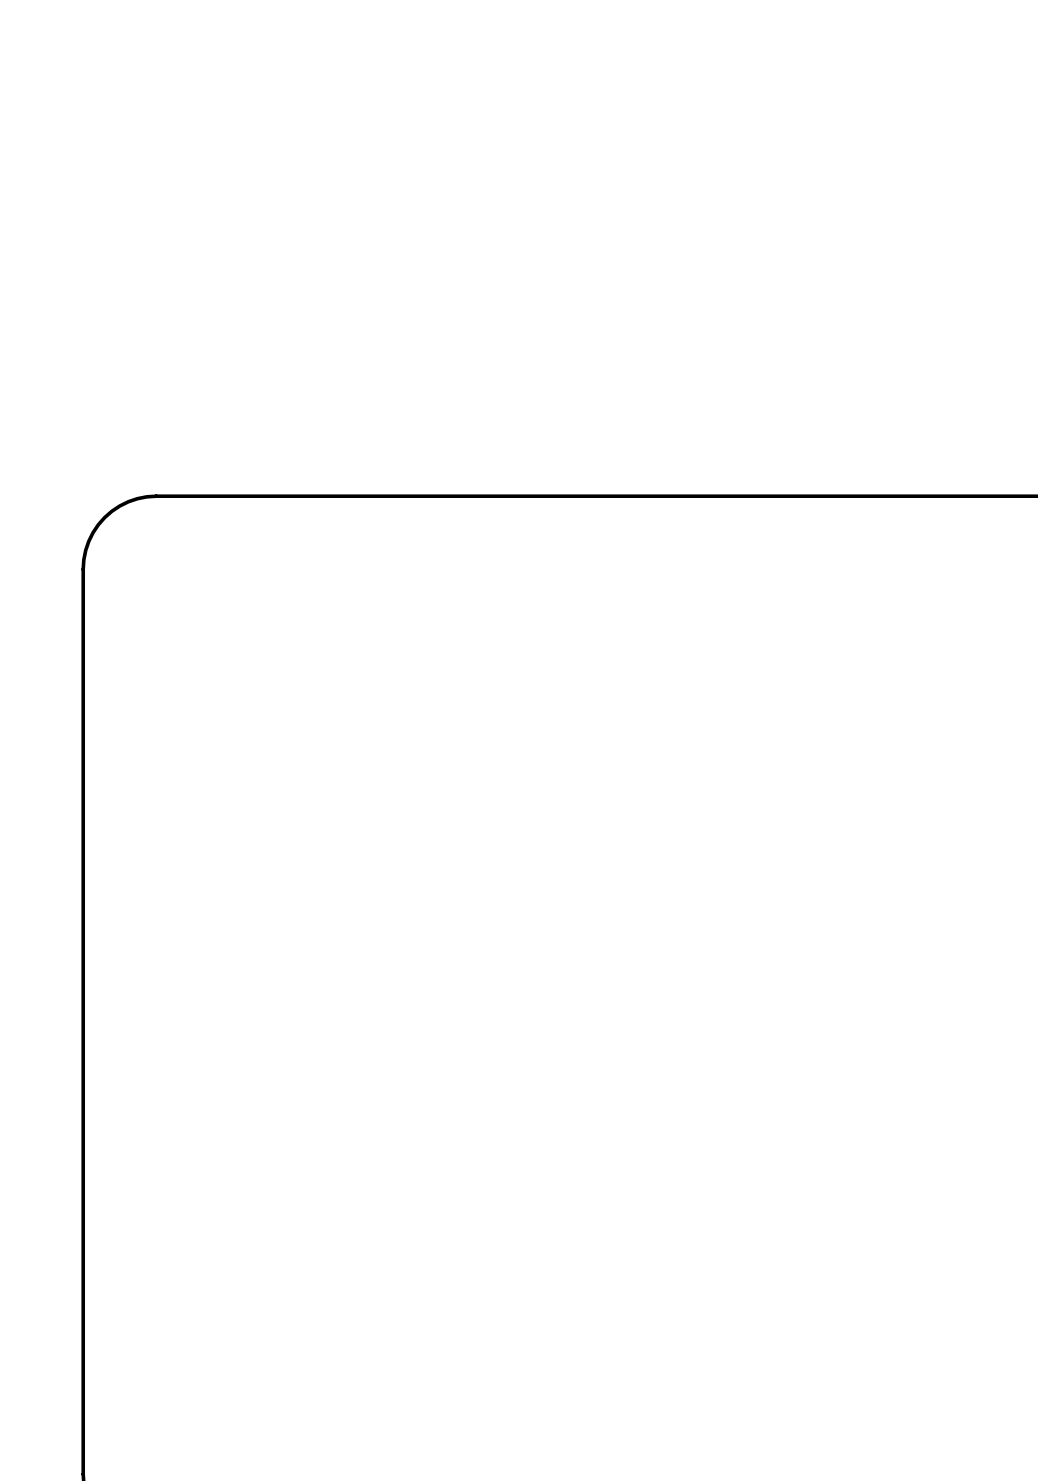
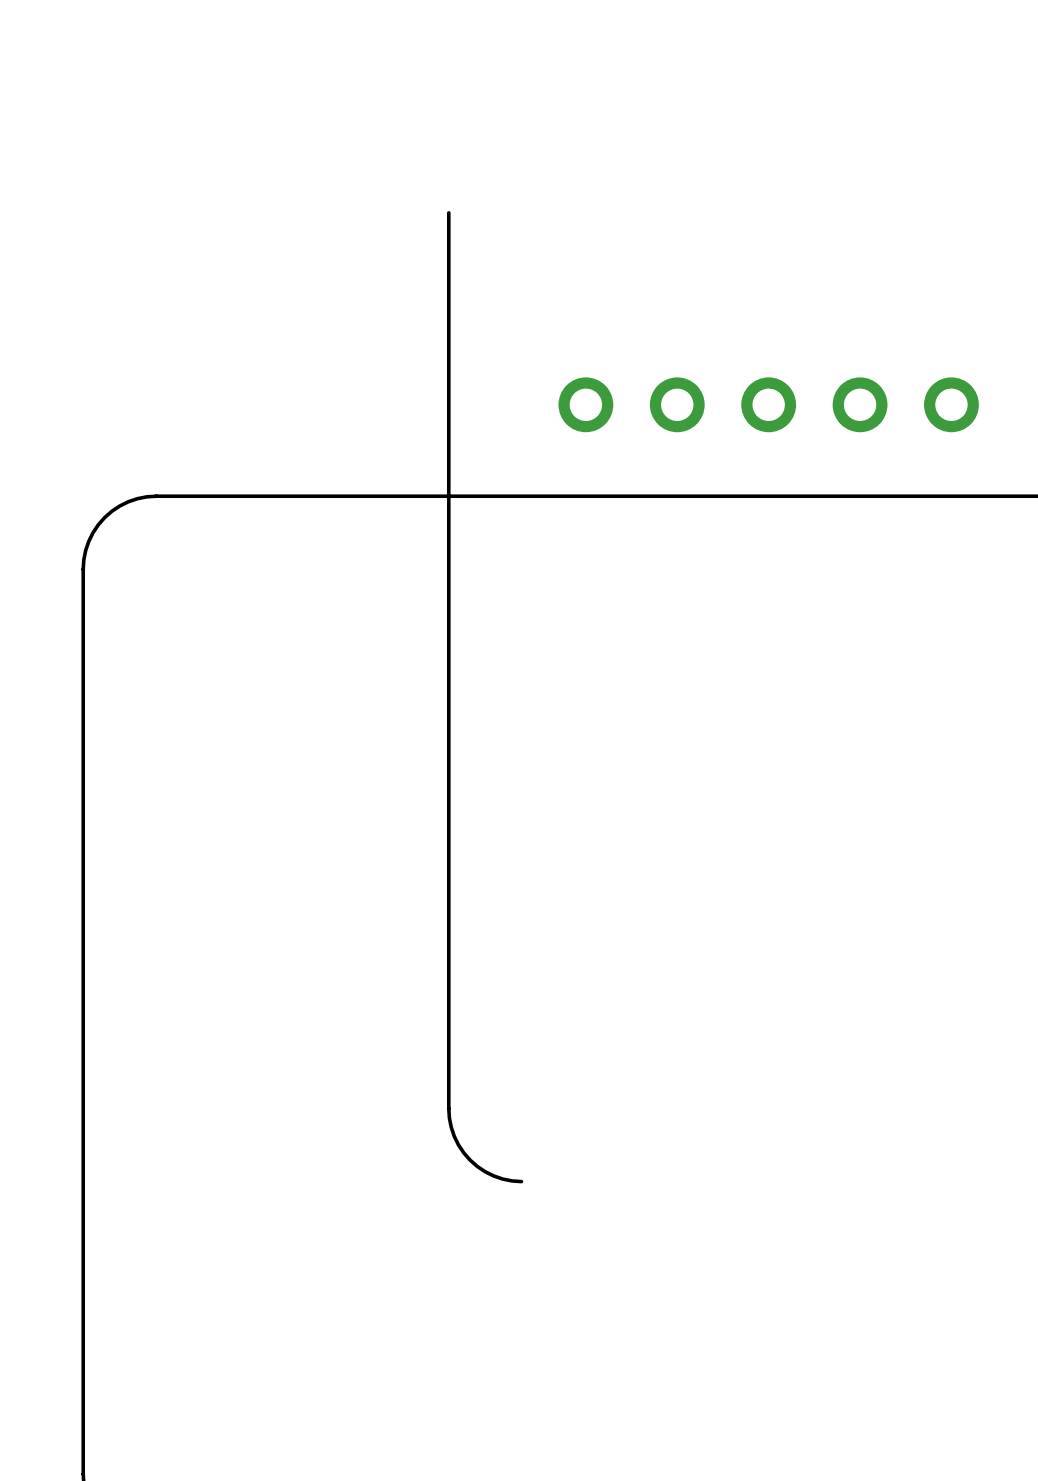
board edge: none -> (448, 212) (449, 1118) (458, 1144) (477, 1166) (502, 1179) (521, 1181)
part: none -> (768, 404)

